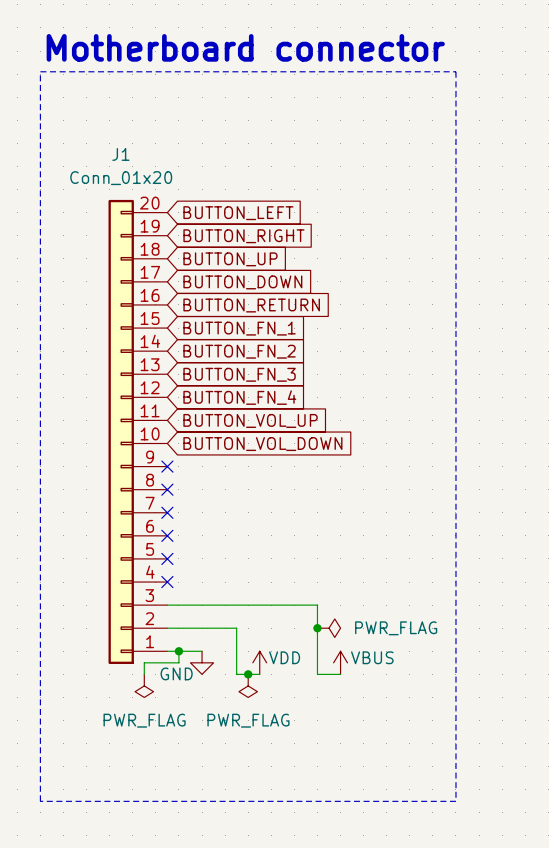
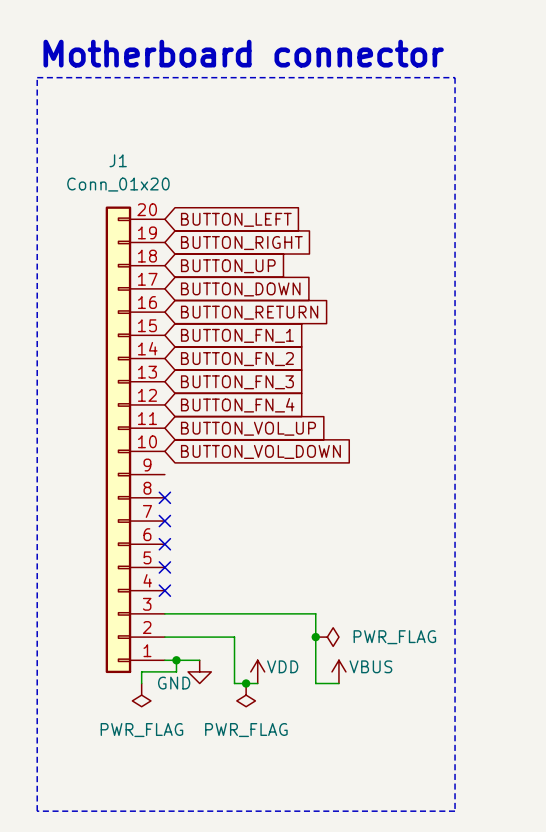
no-connect mark: (167, 466) -> none

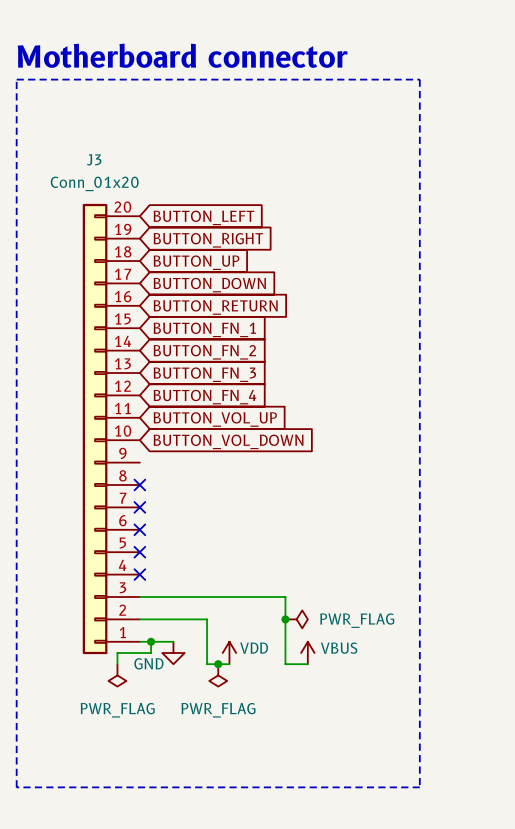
J1 name: J1 (118, 160) -> J3 (94, 159)

